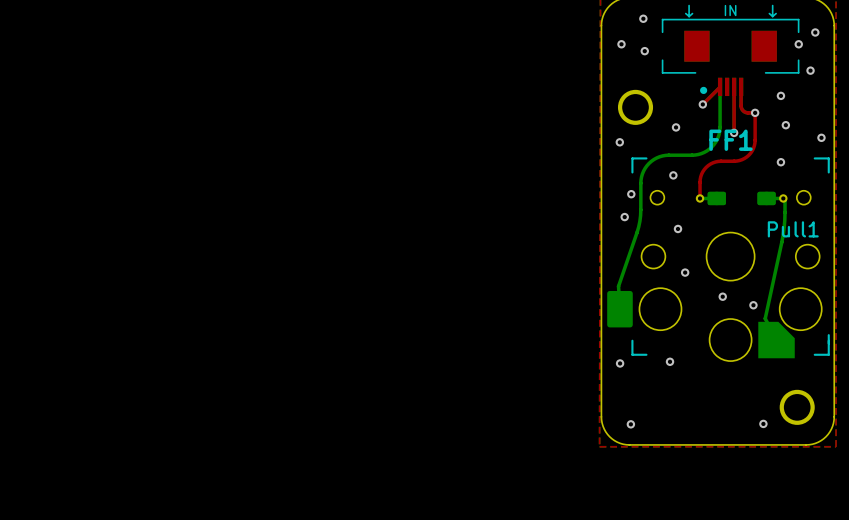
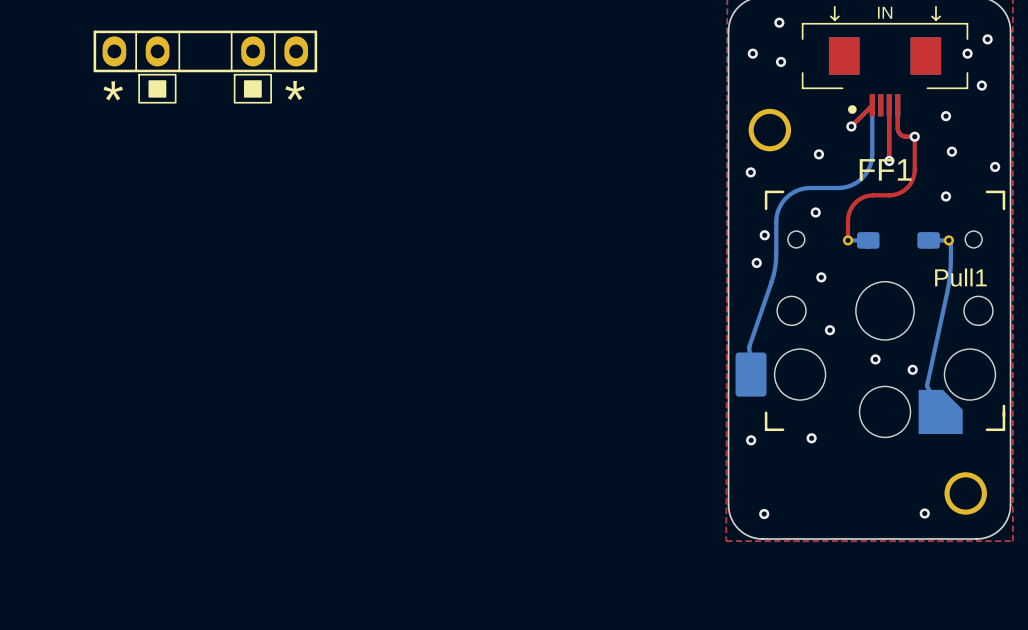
part: none -> (205, 67)

